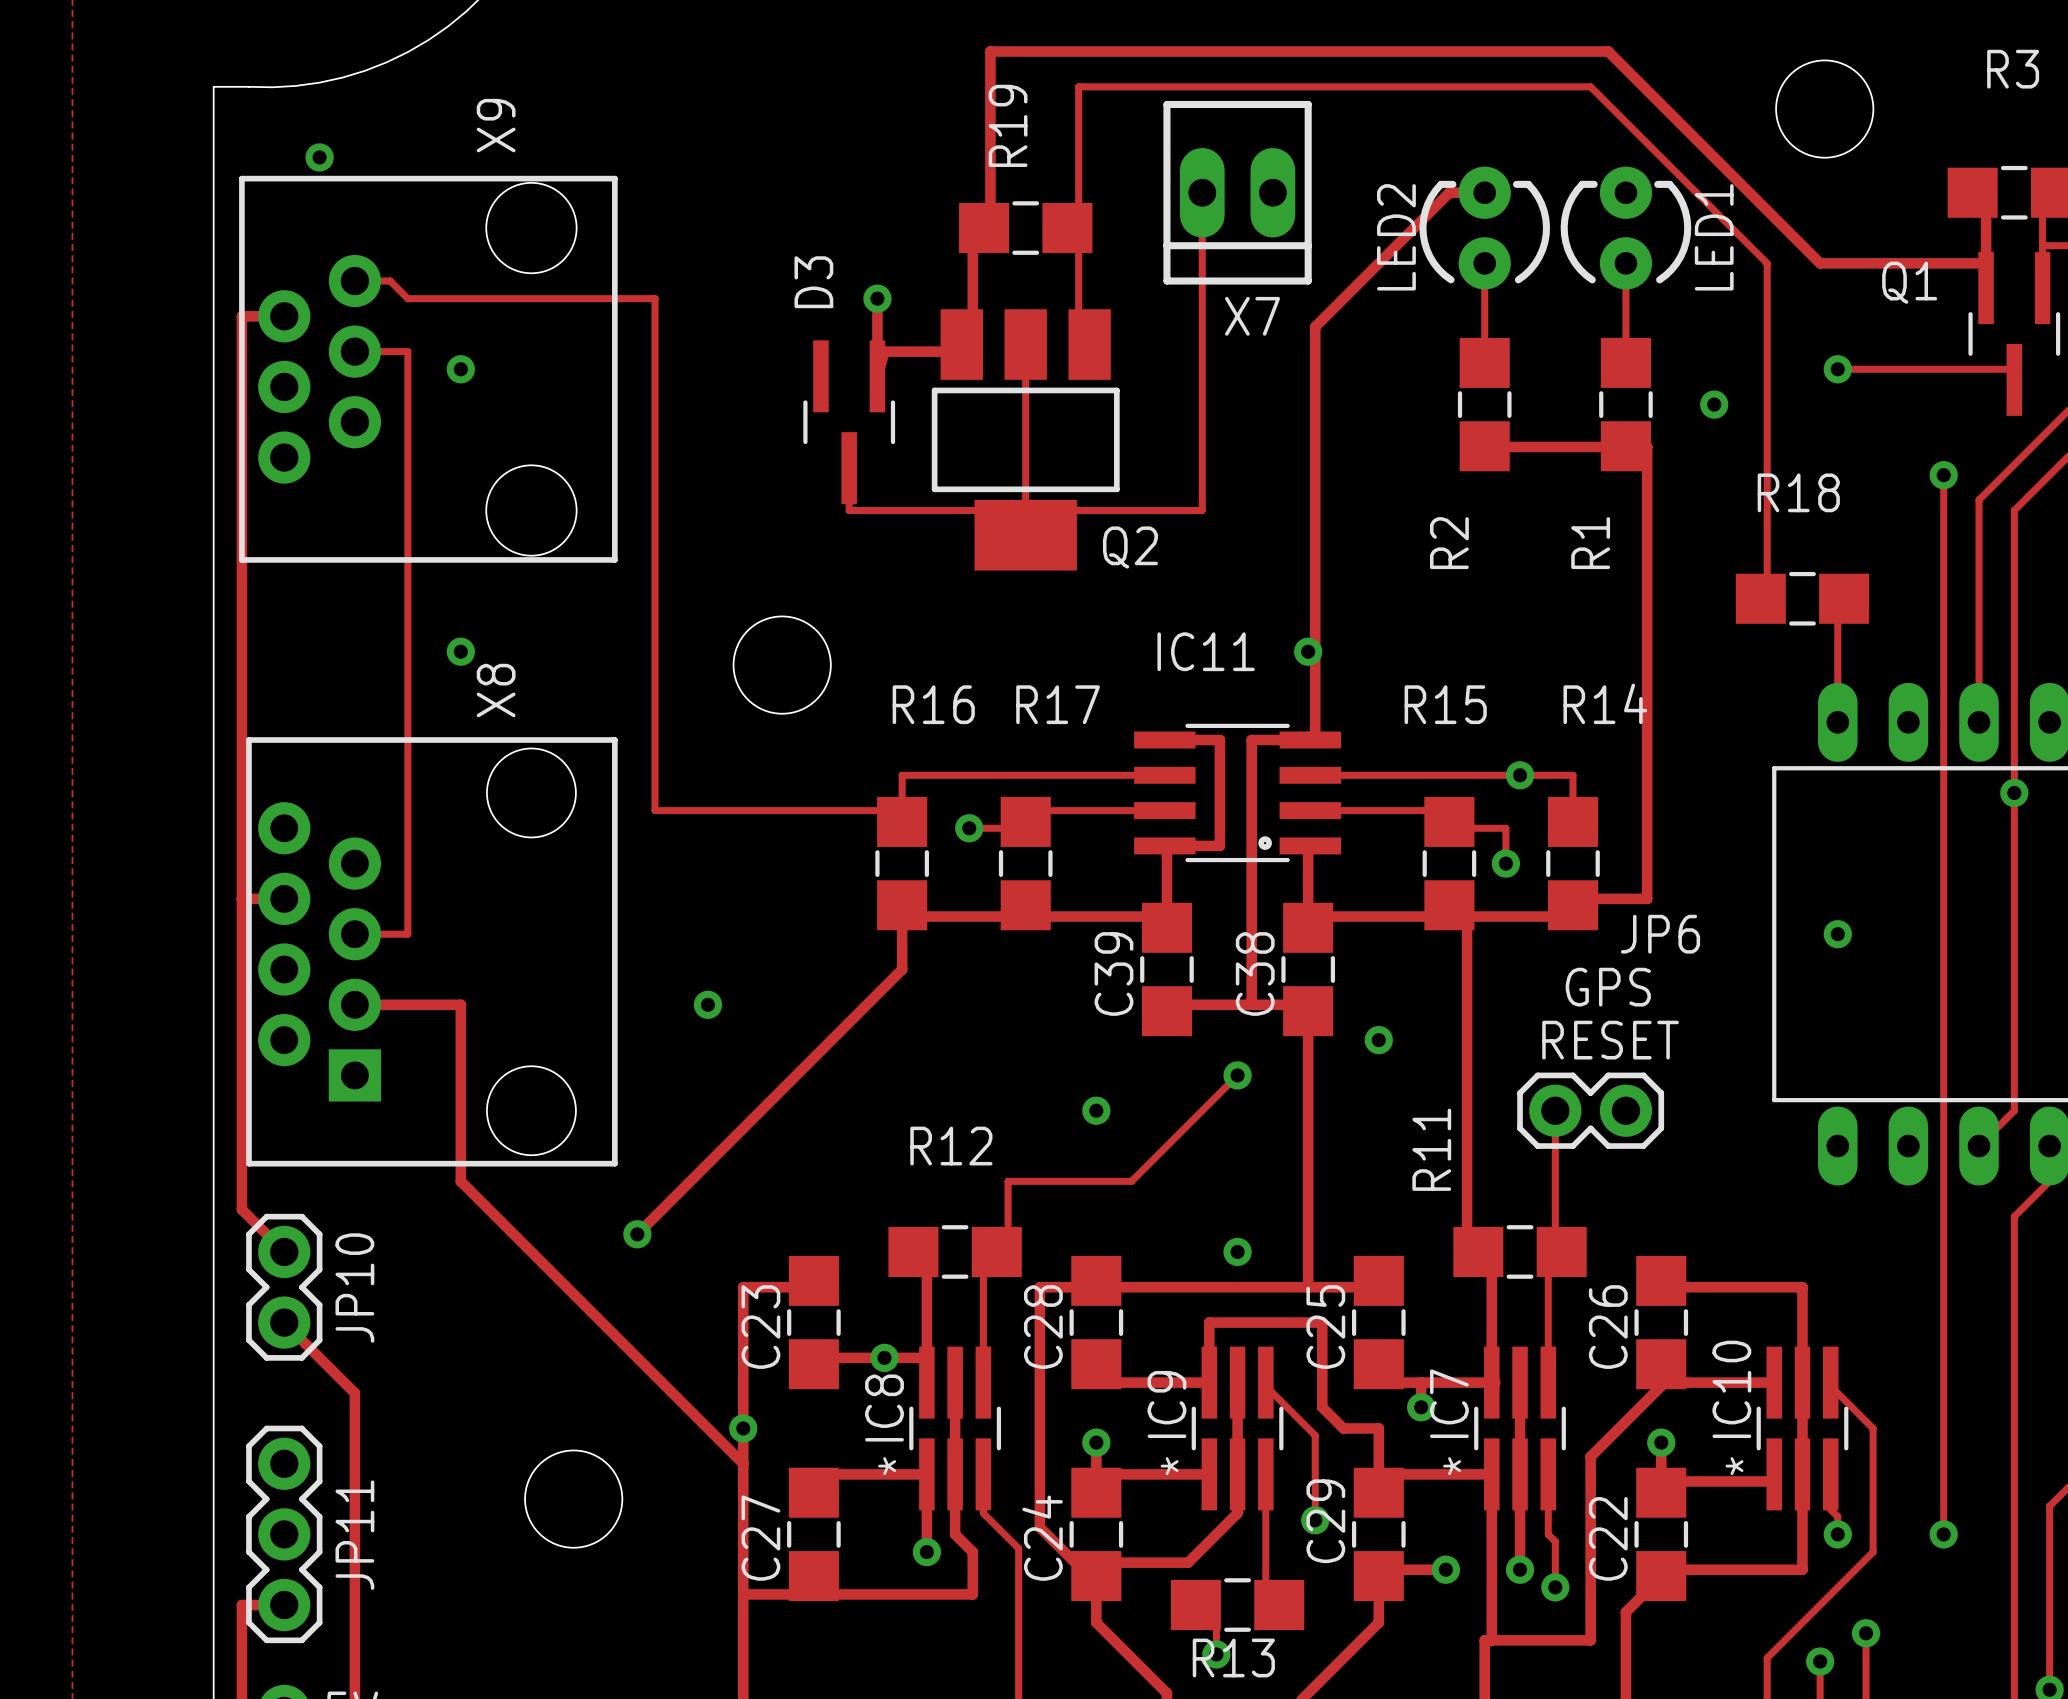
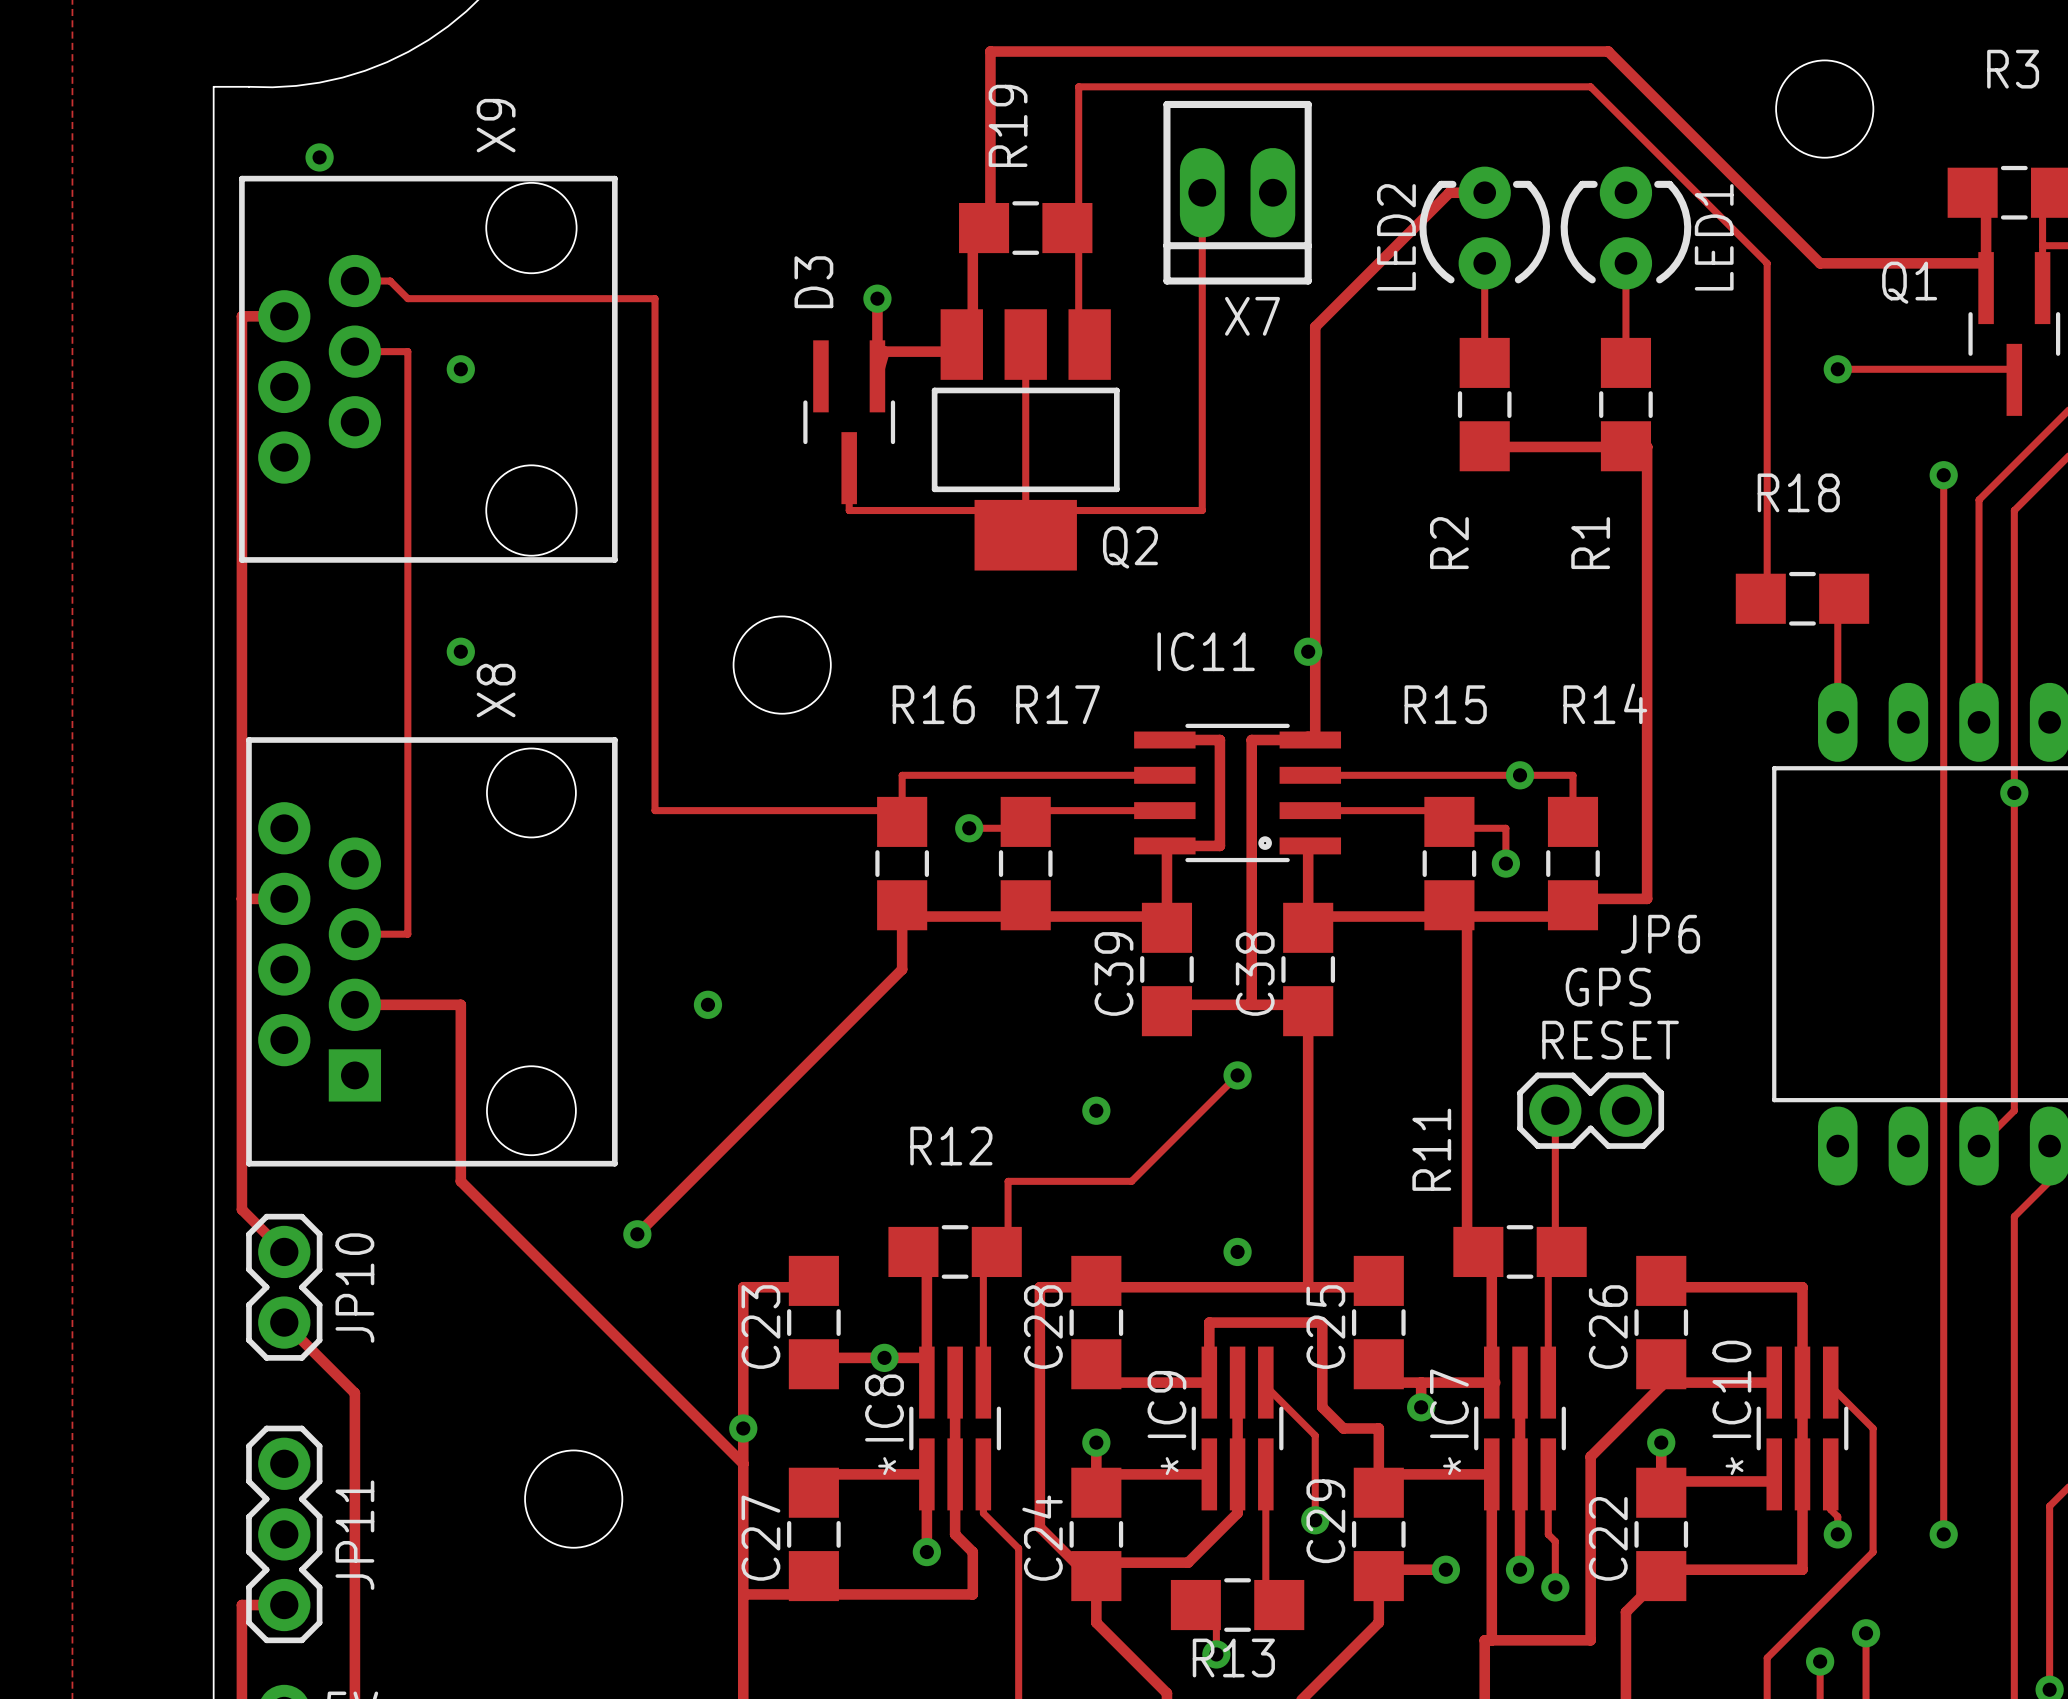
via: (1714, 404) -> none
via: (1837, 934) -> none
via: (1378, 1040) -> none

